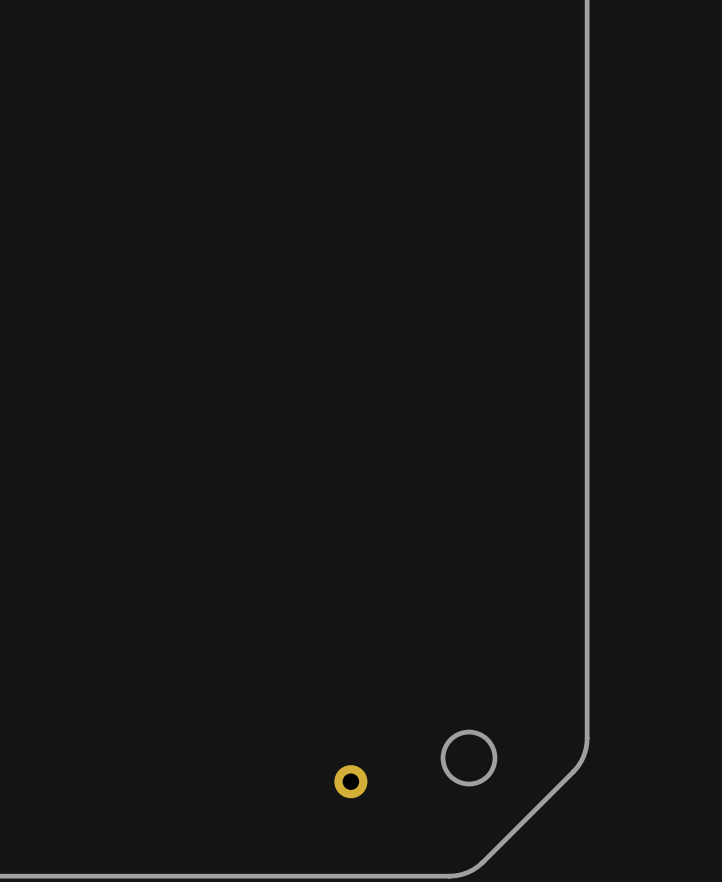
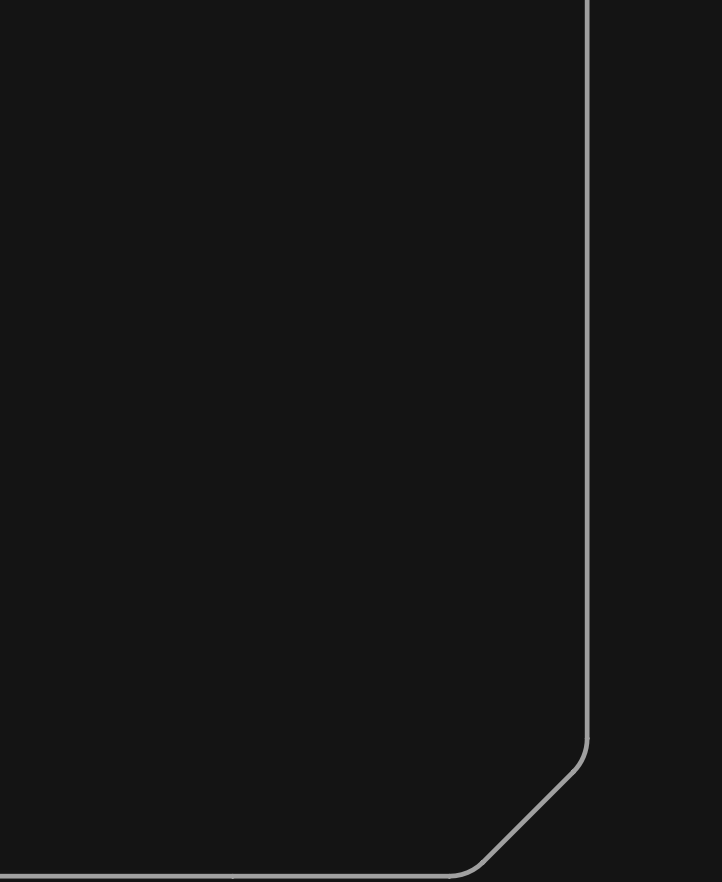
round board edge: [440, 729, 498, 787] -> none
part: (350, 781) -> none

